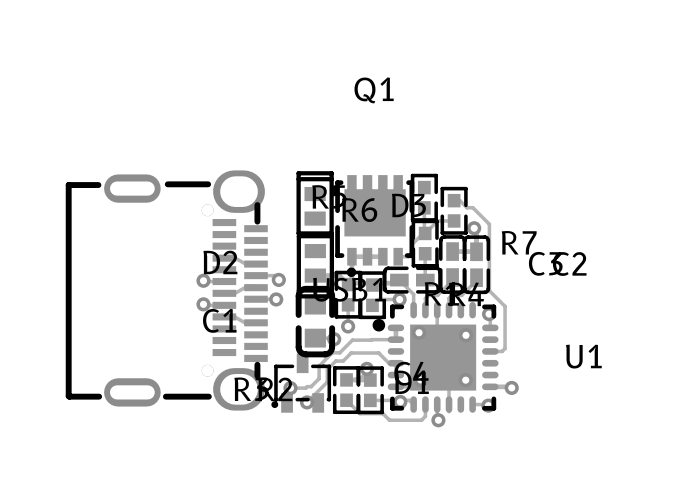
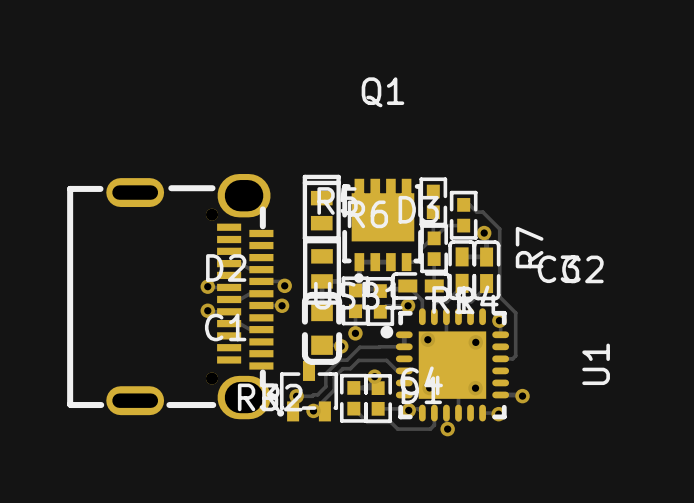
R7 name rotation: 0° (519, 242) -> 90° counterclockwise (529, 247)
U1 name rotation: 0° (583, 356) -> 90° counterclockwise (596, 364)

